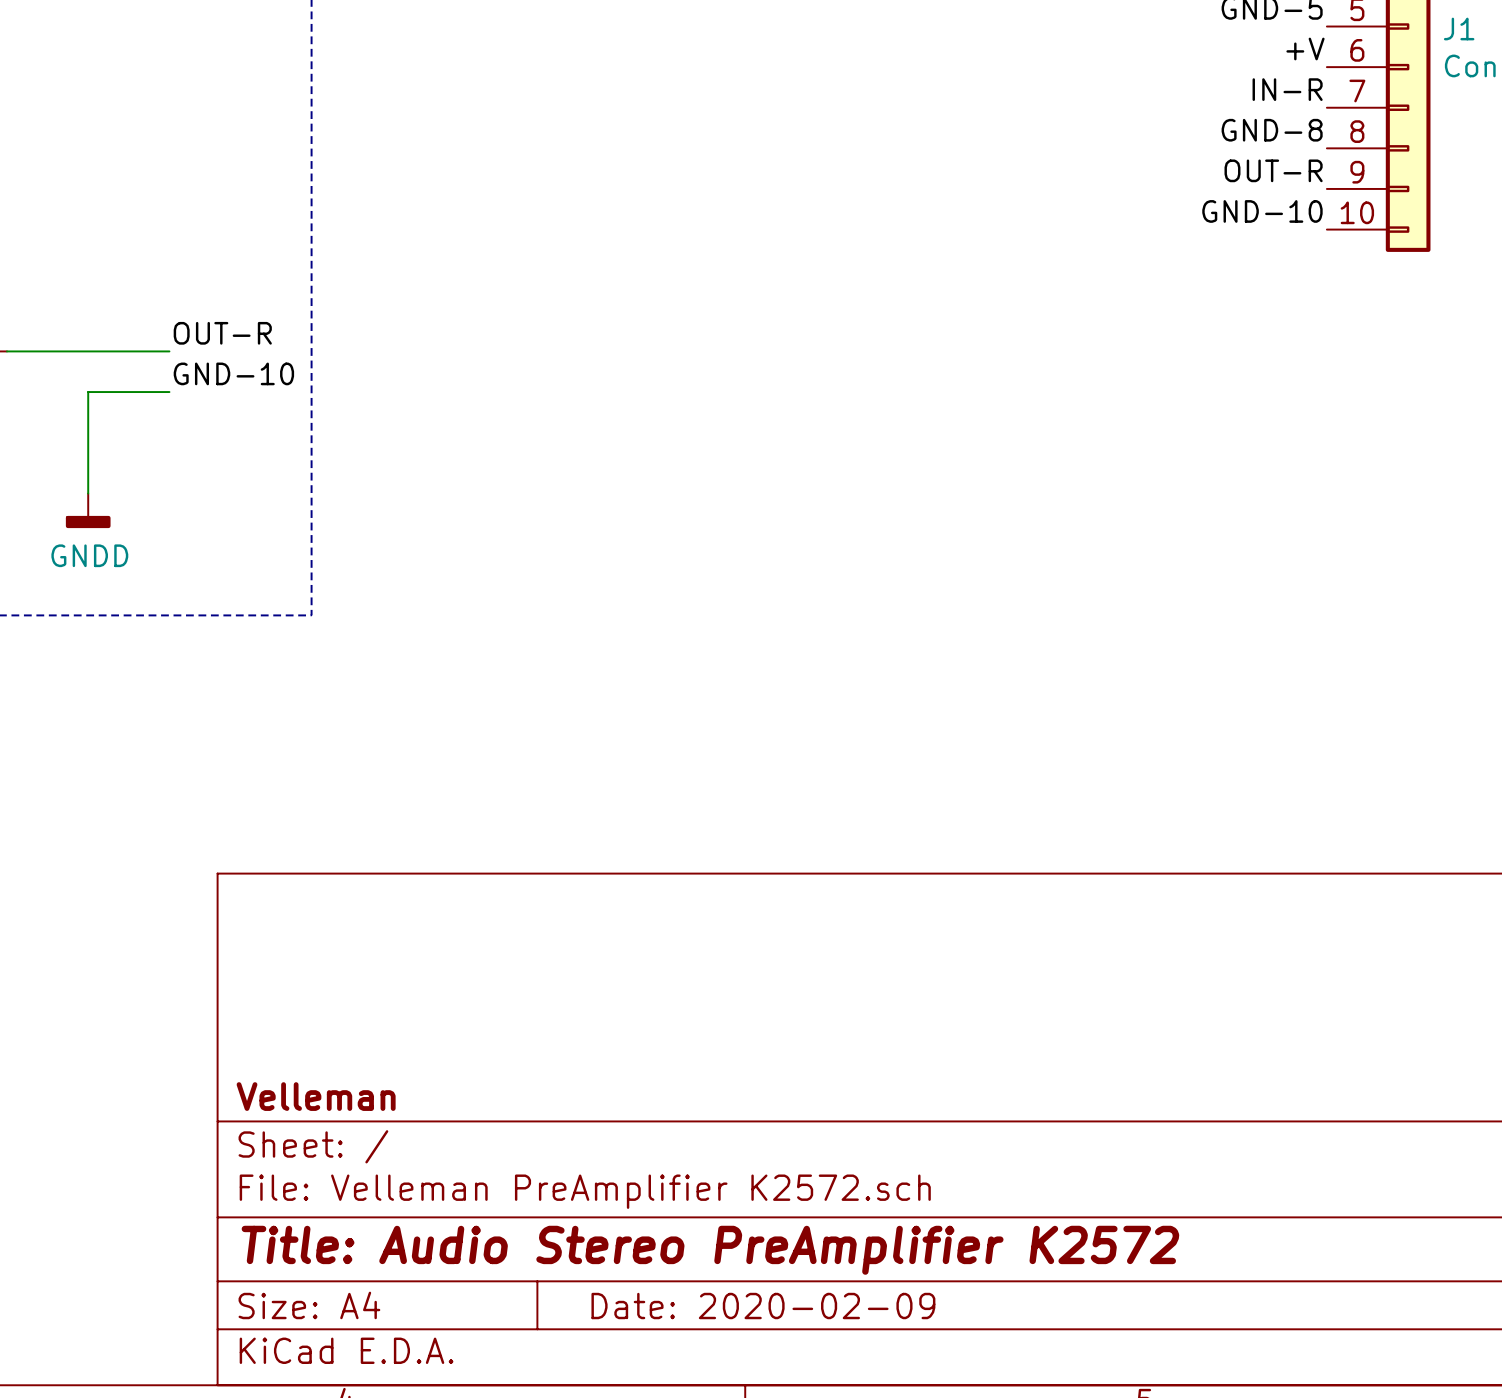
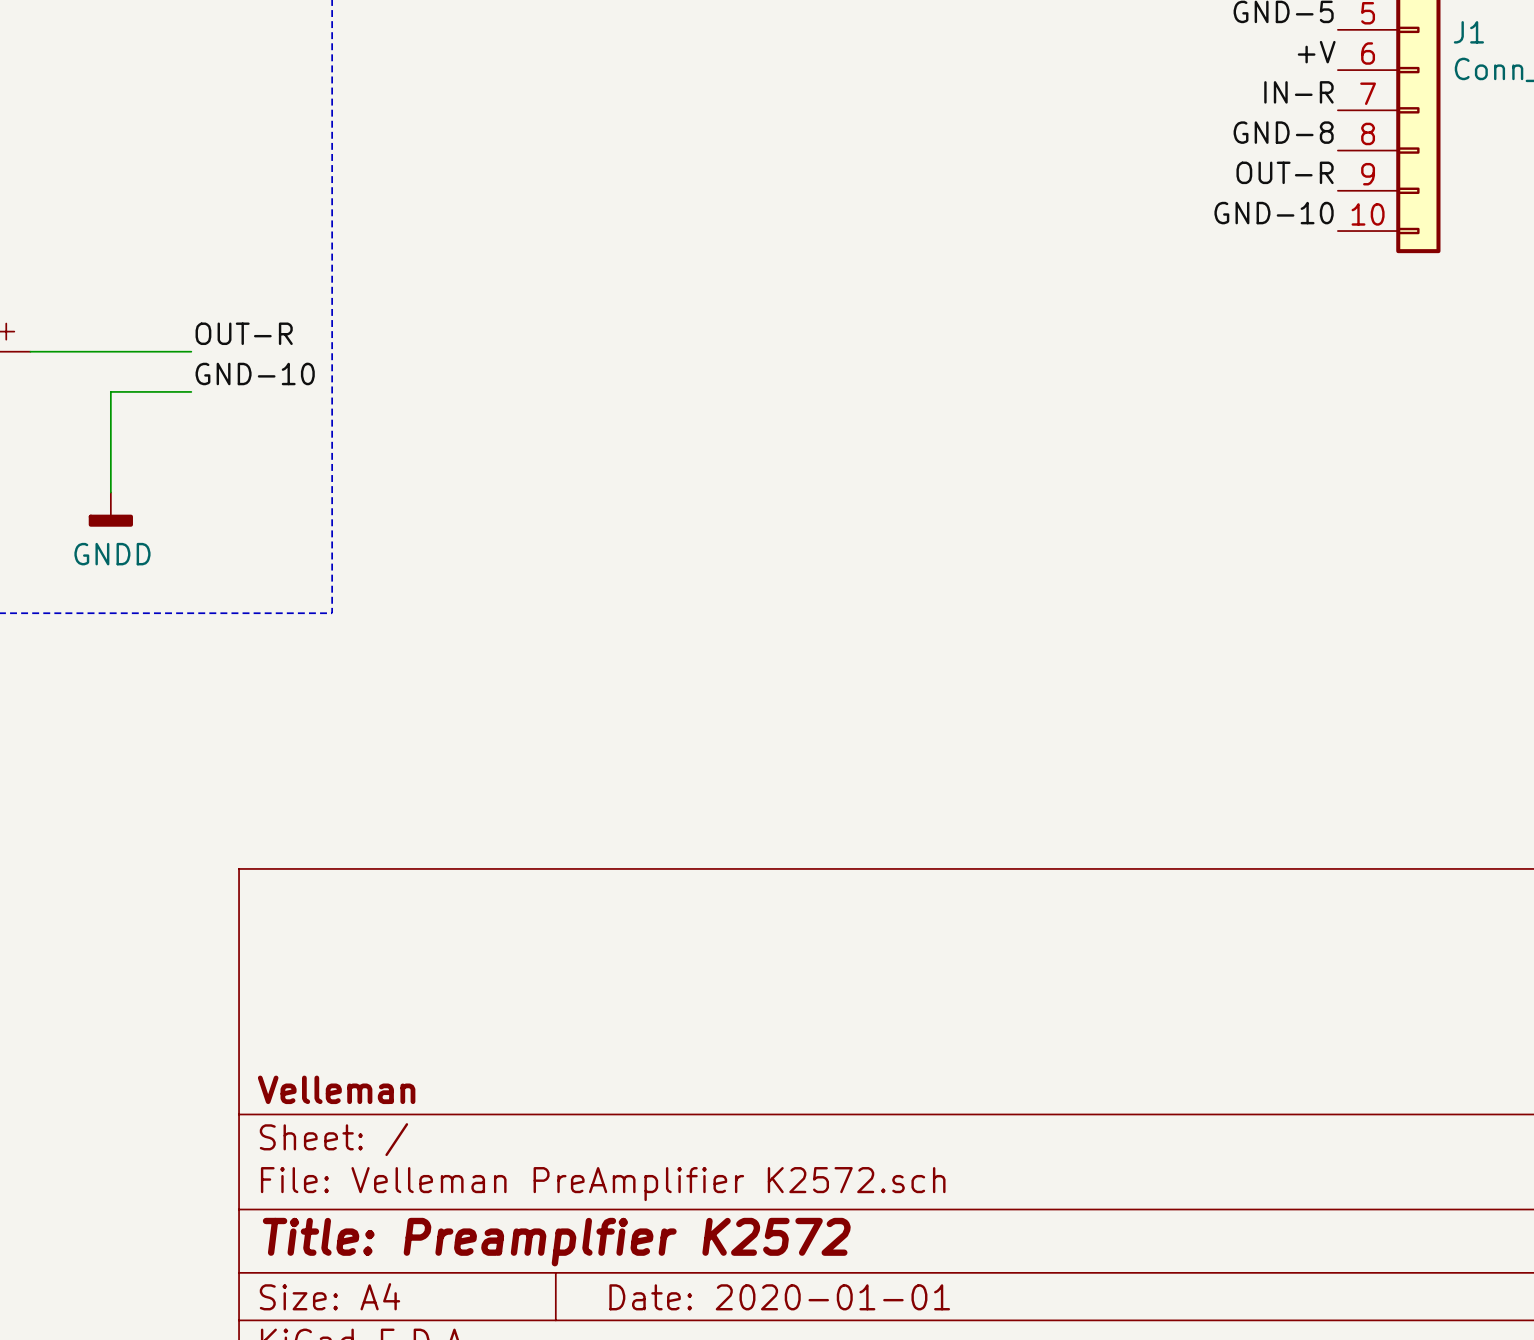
title block: Title: Audio Stereo PreAmplifier K2572 (710, 1250) -> Title: Preamplfier K2572 (556, 1242)
title block: Date: 2020-02-09 (763, 1306) -> Date: 2020-01-01 (779, 1297)

